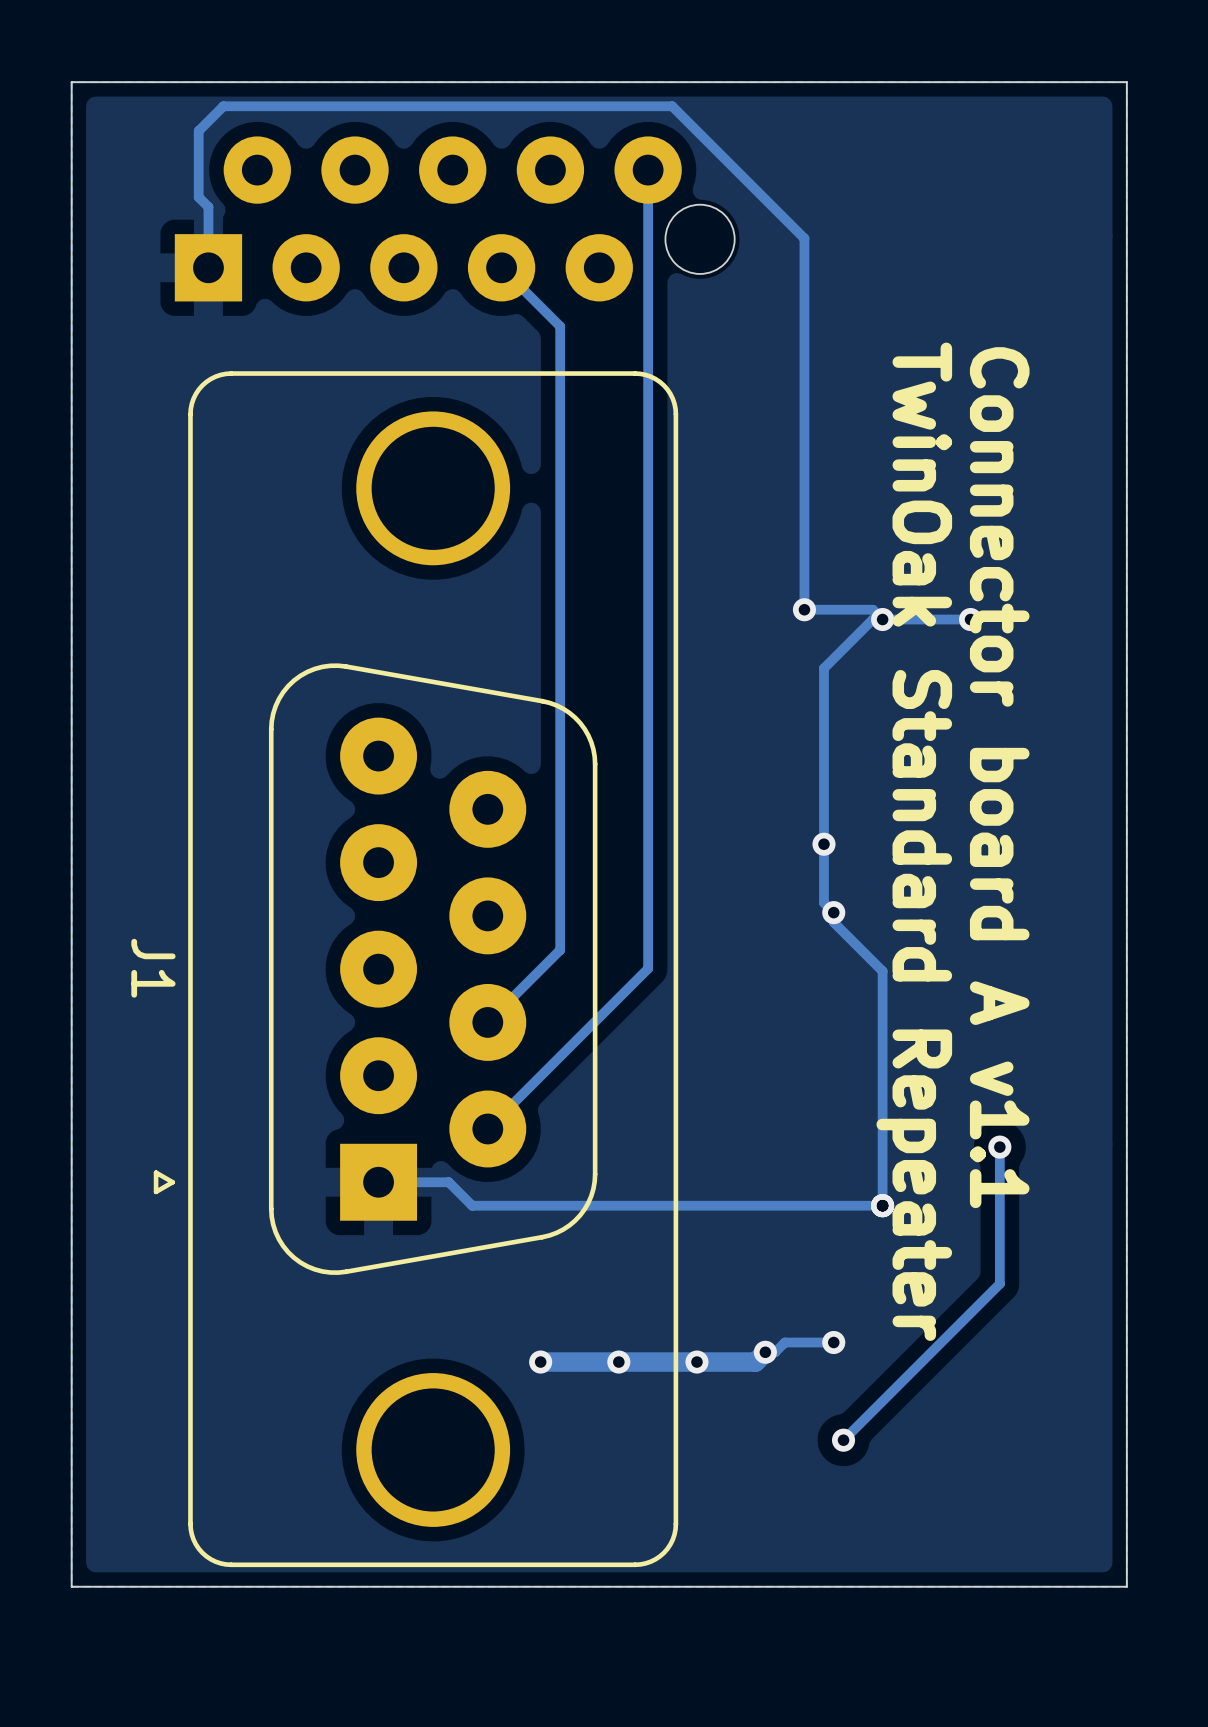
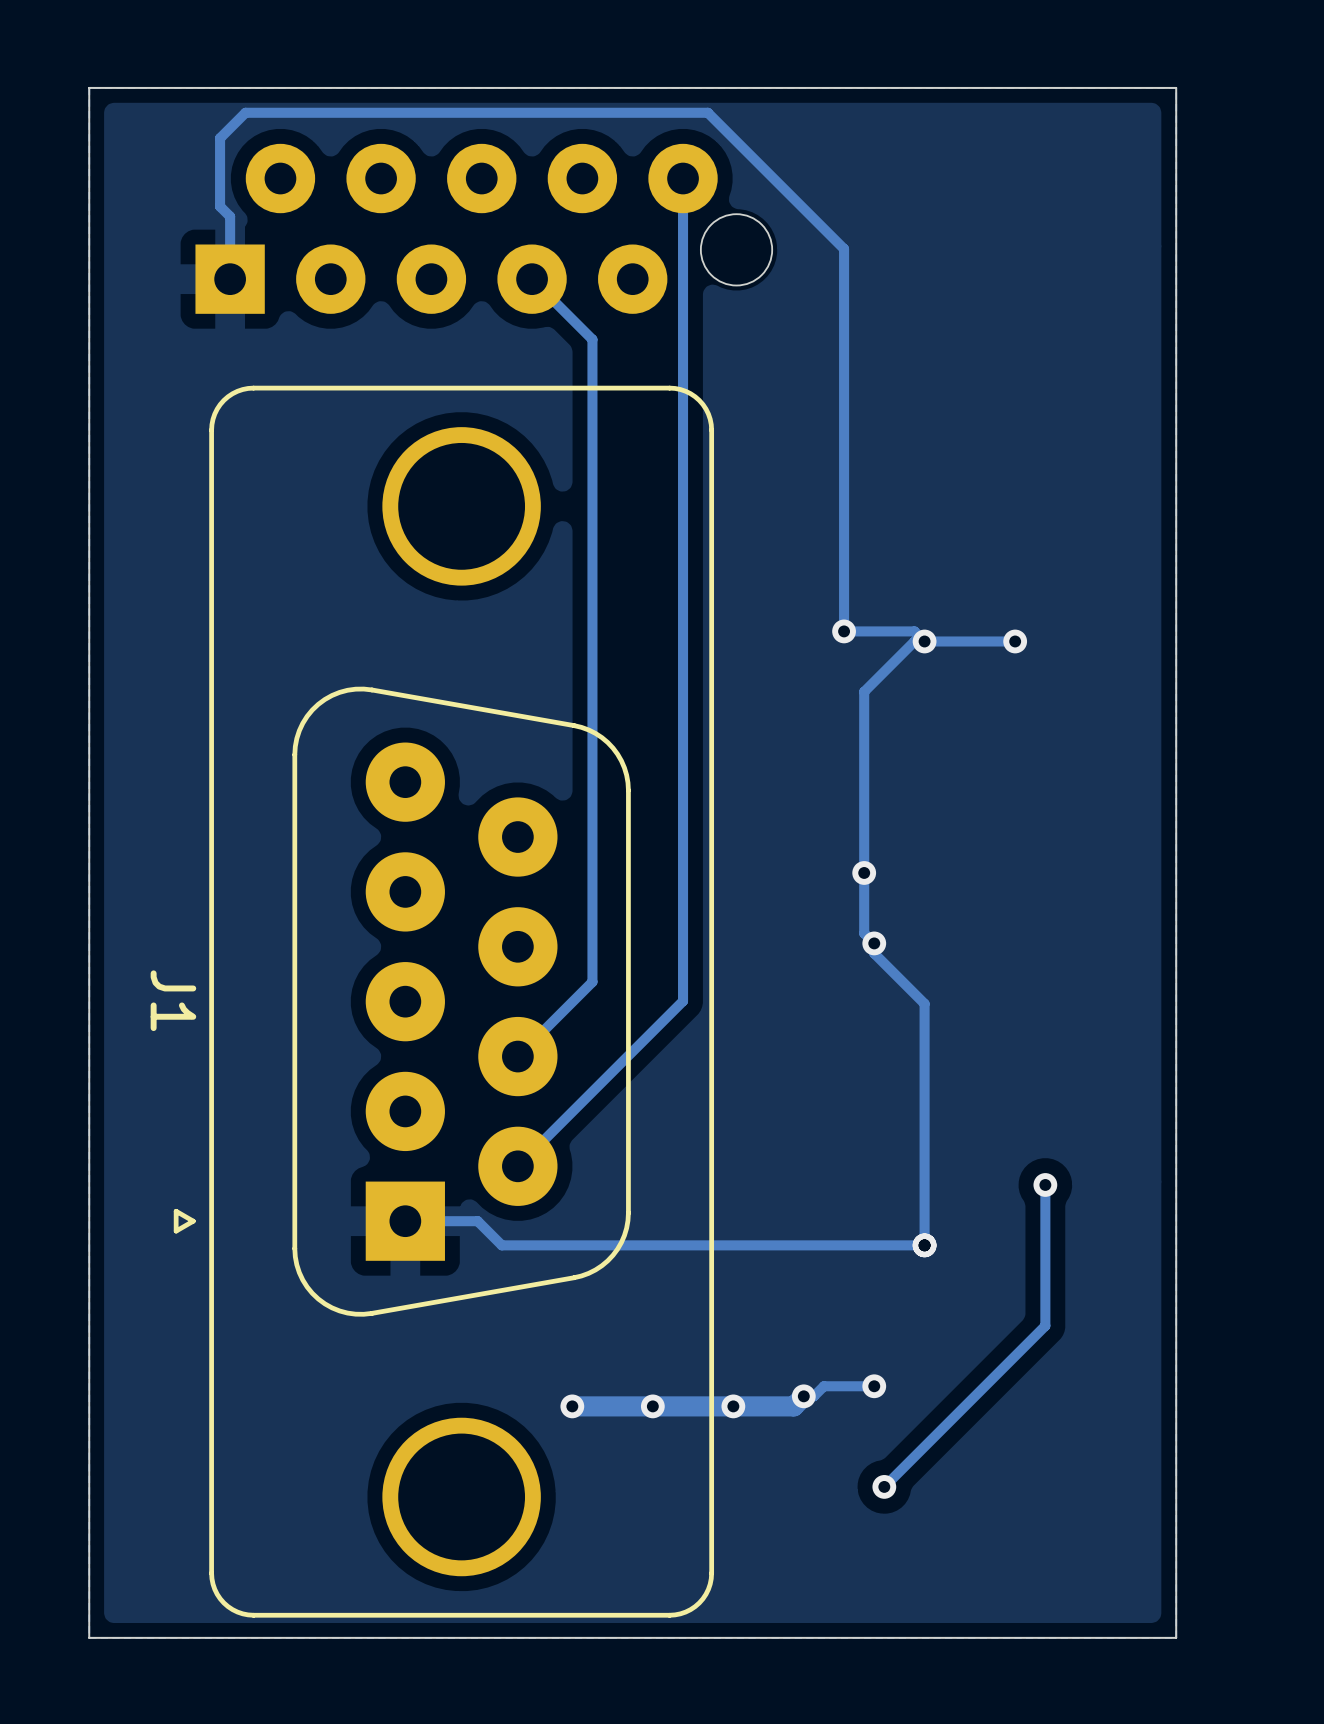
text: Connector board A v1.1 (999, 777) -> none
text: TwinOak Standard Repeater (914, 841) -> none

